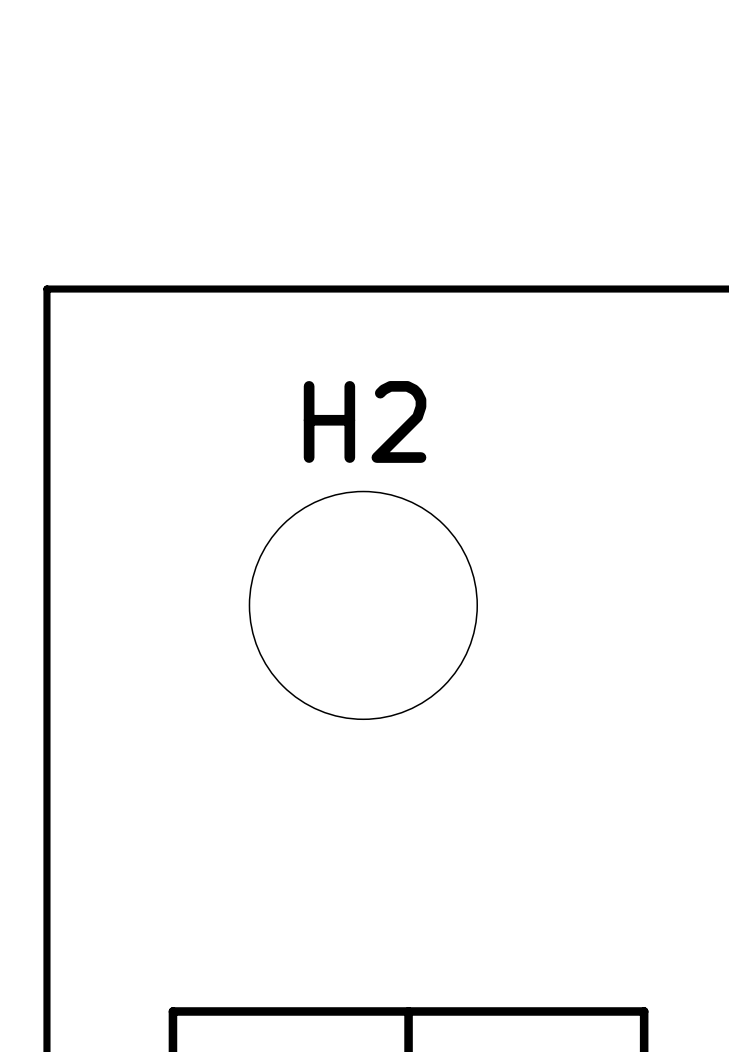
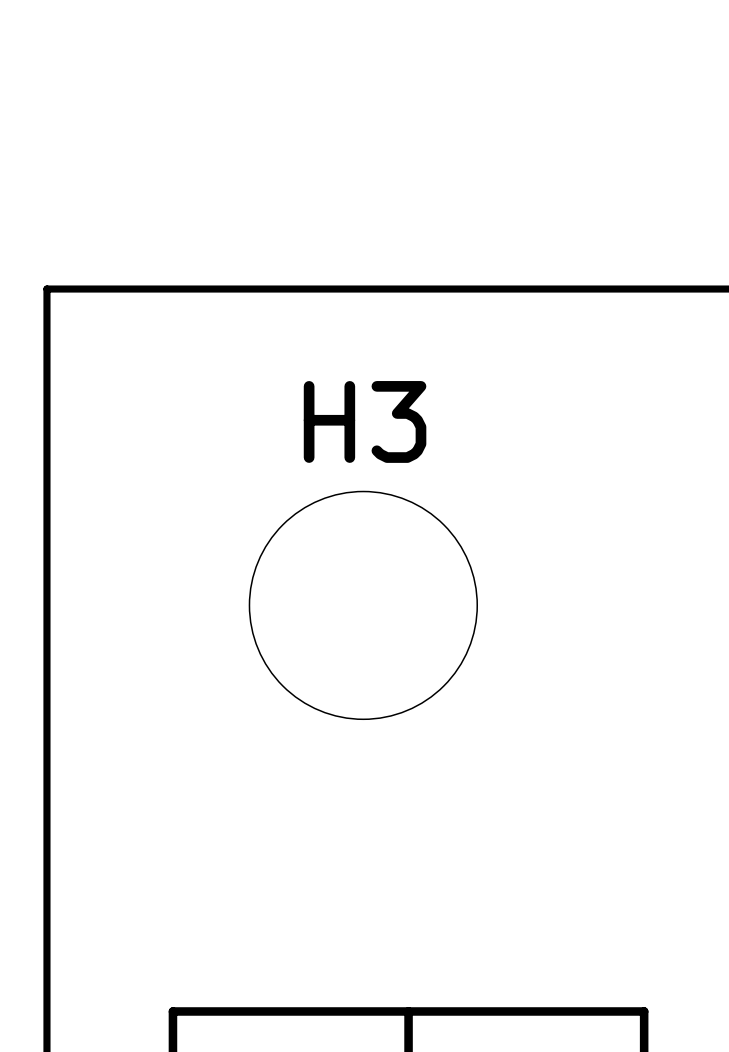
H2 name: H2 (365, 421) -> H3 (365, 421)

